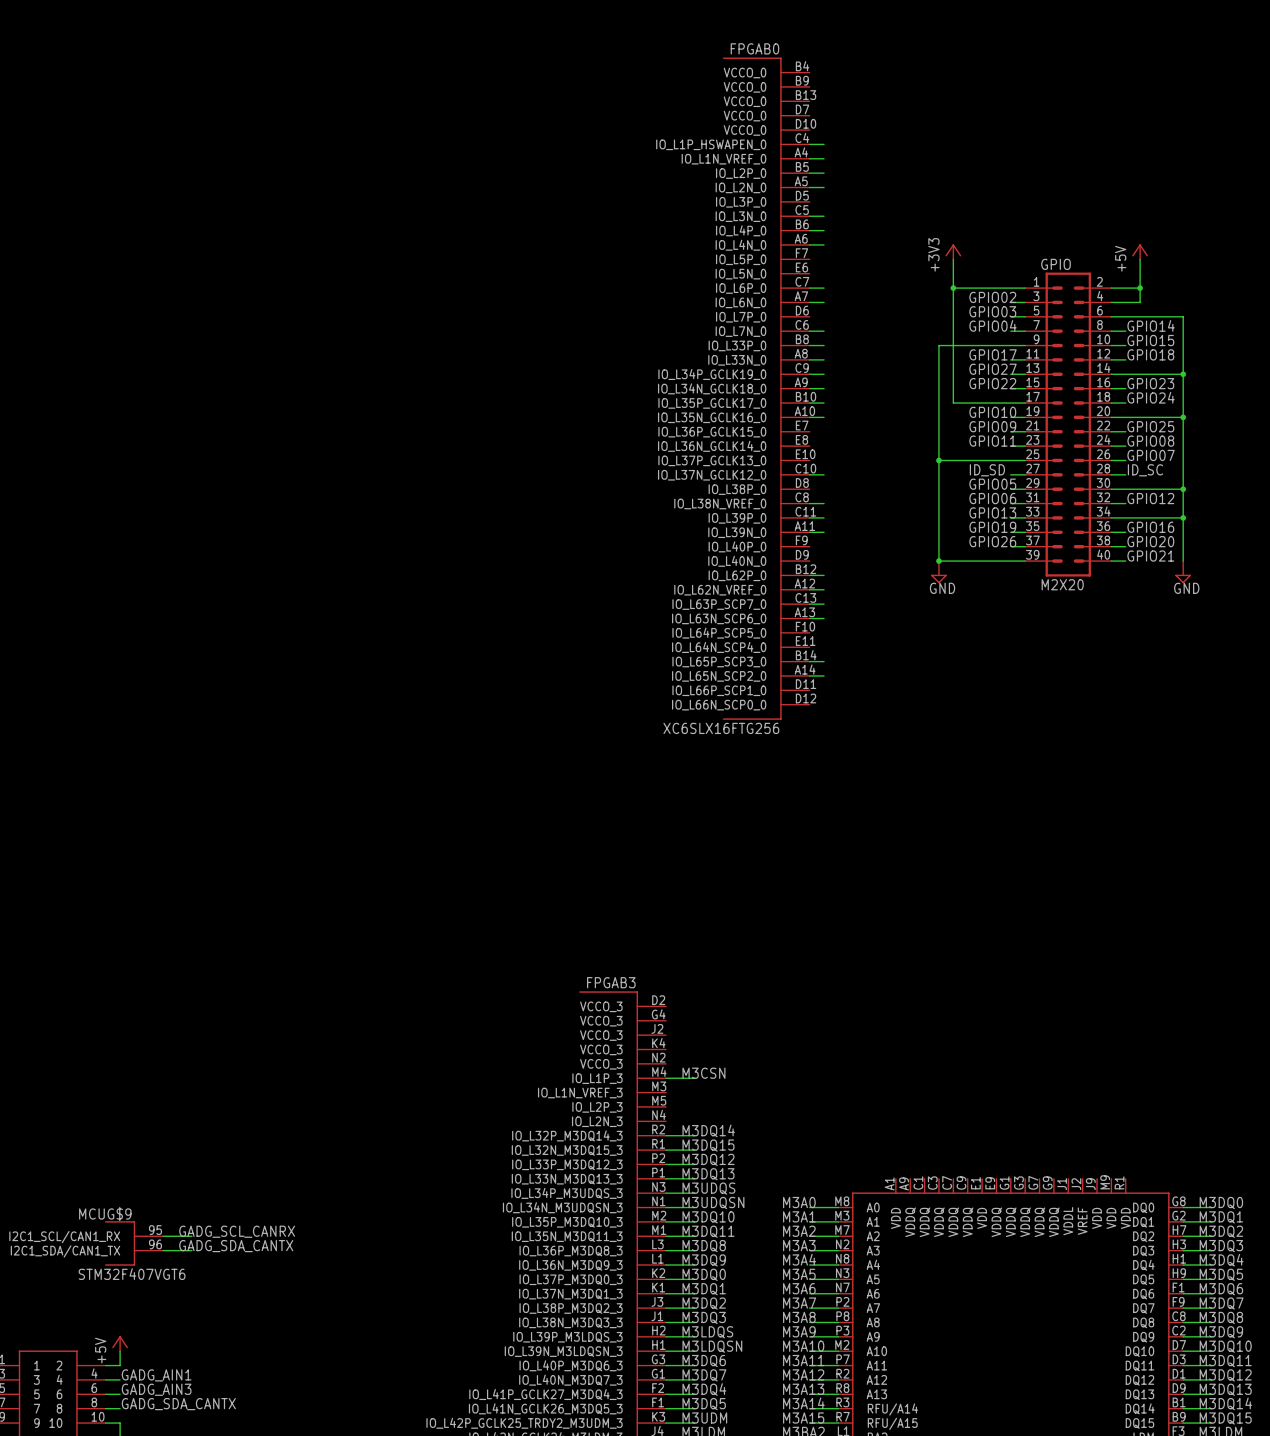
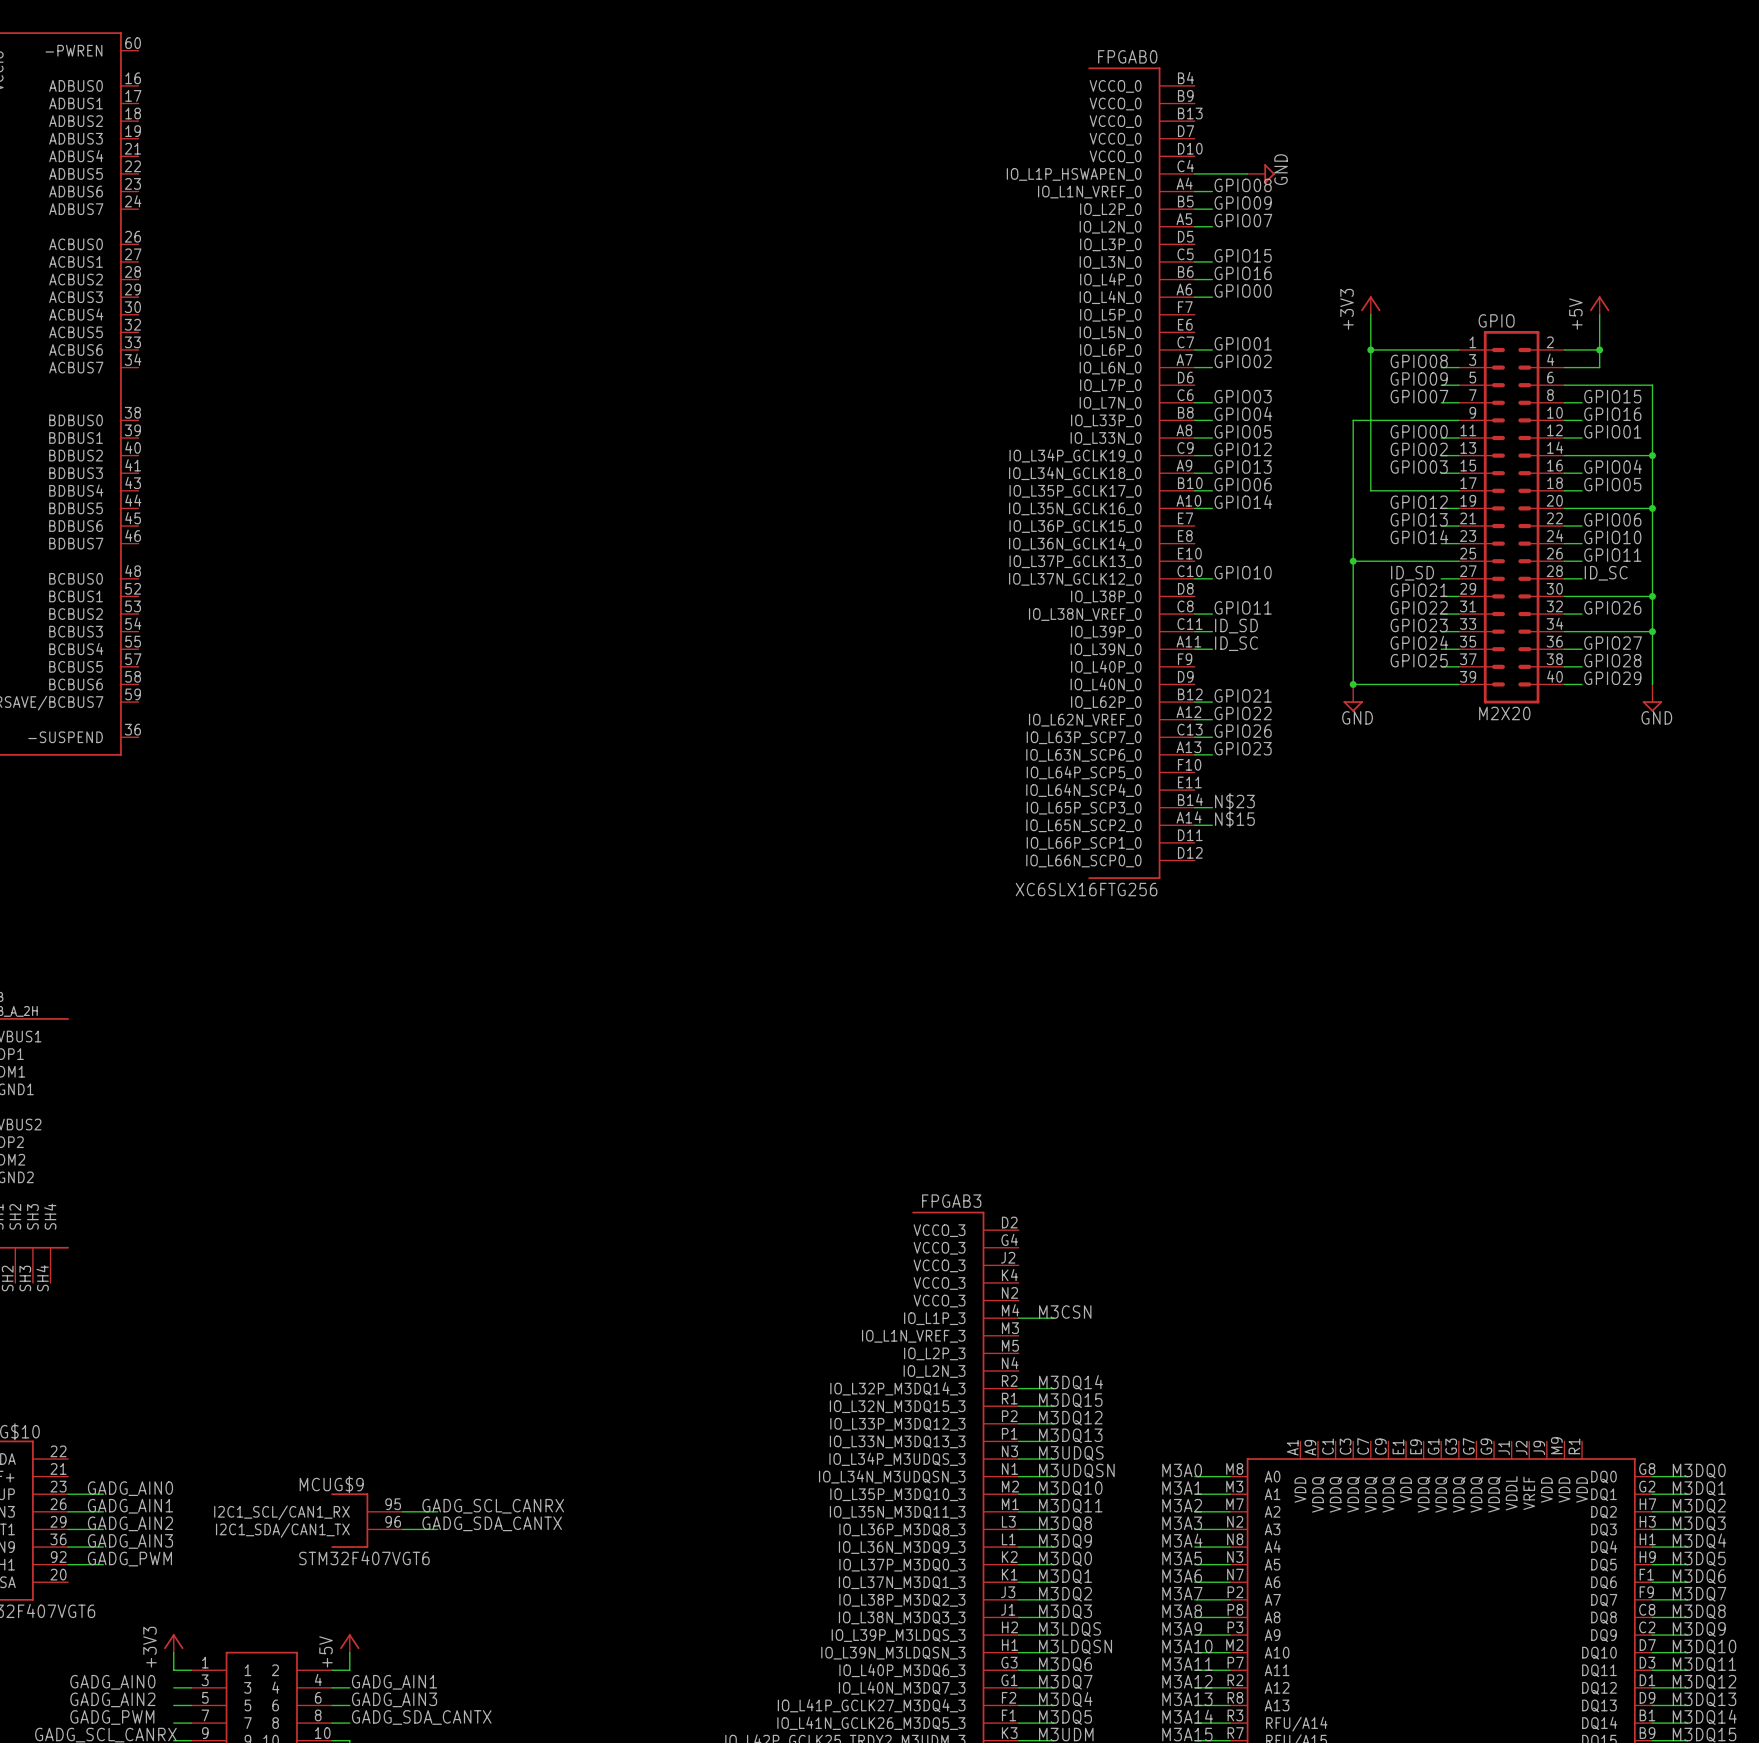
wire: none -> (1212, 173) (1247, 173)
power symbol: none -> GND (1261, 173)
label: none -> GPIO08 (1243, 185)
label: none -> GPIO09 (1243, 202)
label: none -> GPIO07 (1243, 220)
label: none -> GPIO15 (1243, 255)
label: none -> GPIO16 (1243, 273)
label: none -> GPIO00 (1243, 291)
label: none -> GPIO01 (1243, 343)
label: none -> GPIO02 (1243, 361)
label: GPIO02 (992, 297) -> GPIO08 (1419, 361)
label: GPIO03 (992, 311) -> GPIO09 (1419, 379)
label: GPIO04 (993, 325) -> GPIO07 (1419, 396)
label: GPIO14 (1151, 325) -> GPIO15 (1612, 396)
label: none -> GPIO03 (1243, 396)
label: none -> GPIO04 (1243, 413)
label: GPIO15 (1150, 340) -> GPIO16 (1612, 414)
label: none -> GPIO05 (1243, 431)
label: GPIO17 (993, 354) -> GPIO00 (1419, 431)
label: GPIO18 (1150, 354) -> GPIO01 (1612, 431)
label: none -> GPIO12 (1243, 449)
label: GPIO27 (993, 369) -> GPIO02 (1419, 449)
label: none -> GPIO13 (1243, 467)
label: GPIO22 (992, 383) -> GPIO03 (1419, 467)
label: GPIO23 (1150, 383) -> GPIO04 (1613, 466)
label: none -> GPIO06 (1243, 484)
label: GPIO24 (1151, 397) -> GPIO05 (1612, 484)
label: none -> GPIO14 (1243, 501)
label: GPIO10 (992, 412) -> GPIO12 (1419, 502)
label: GPIO09 (992, 426) -> GPIO13 (1419, 519)
label: GPIO25 (1150, 426) -> GPIO06 (1612, 519)
label: GPIO11 (992, 441) -> GPIO14 (1419, 537)
label: GPIO08 (1150, 441) -> GPIO10 (1612, 537)
label: GPIO07 (1151, 455) -> GPIO11 (1612, 555)
label: none -> GPIO10 (1243, 572)
label: GPIO05 (992, 484) -> GPIO21 (1419, 590)
label: none -> GPIO11 (1243, 607)
label: GPIO06 (992, 498) -> GPIO22 (1419, 607)
label: GPIO12 (1150, 498) -> GPIO26 (1612, 607)
label: GPIO13 (992, 512) -> GPIO23 (1419, 625)
label: none -> ID_SD (1236, 626)
label: none -> ID_SC (1236, 643)
label: GPIO19 (992, 527) -> GPIO24 (1419, 642)
label: GPIO16 (1150, 527) -> GPIO27 (1613, 643)
label: GPIO26 (992, 541) -> GPIO25 (1419, 660)
label: GPIO20 (1150, 541) -> GPIO28 (1612, 660)
label: GPIO21 (1150, 556) -> GPIO29 (1612, 678)
label: none -> GPIO21 (1243, 695)
label: none -> GPIO22 (1243, 713)
label: none -> GPIO26 (1243, 731)
label: none -> GPIO23 (1243, 748)
label: none -> N$23 (1234, 801)
label: none -> N$15 (1234, 819)

